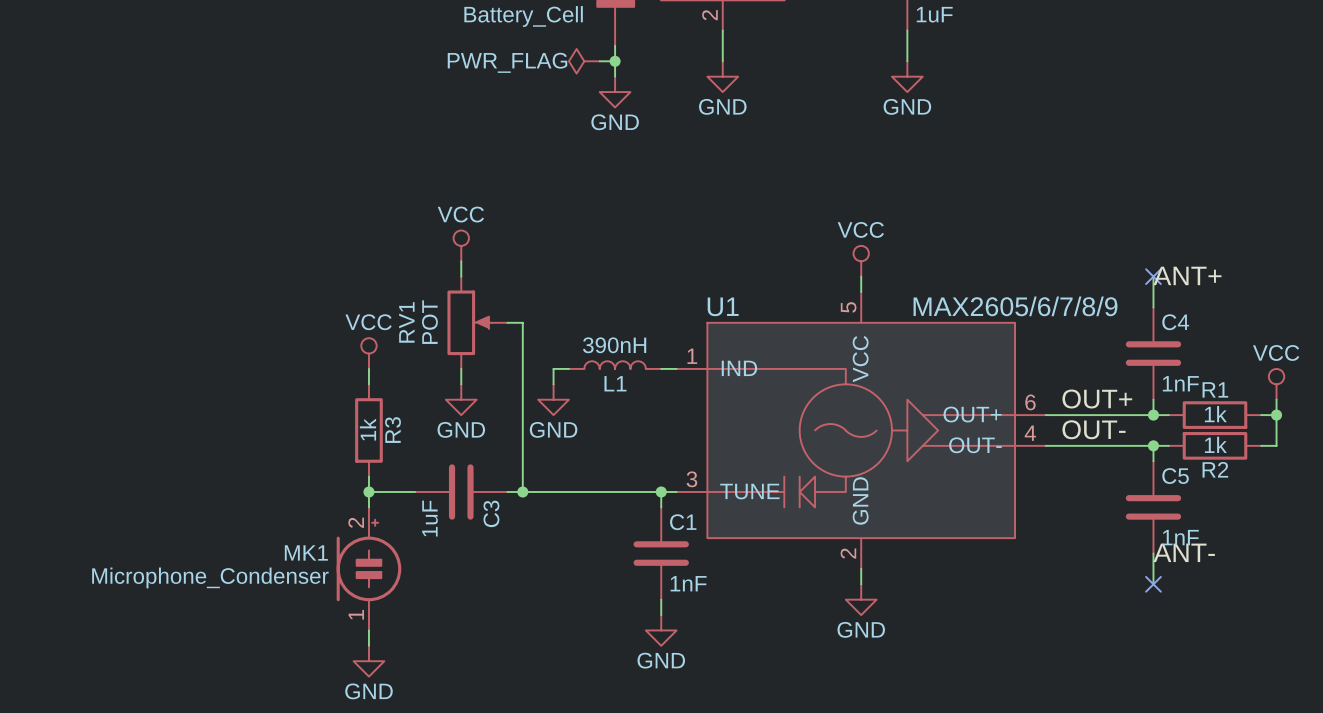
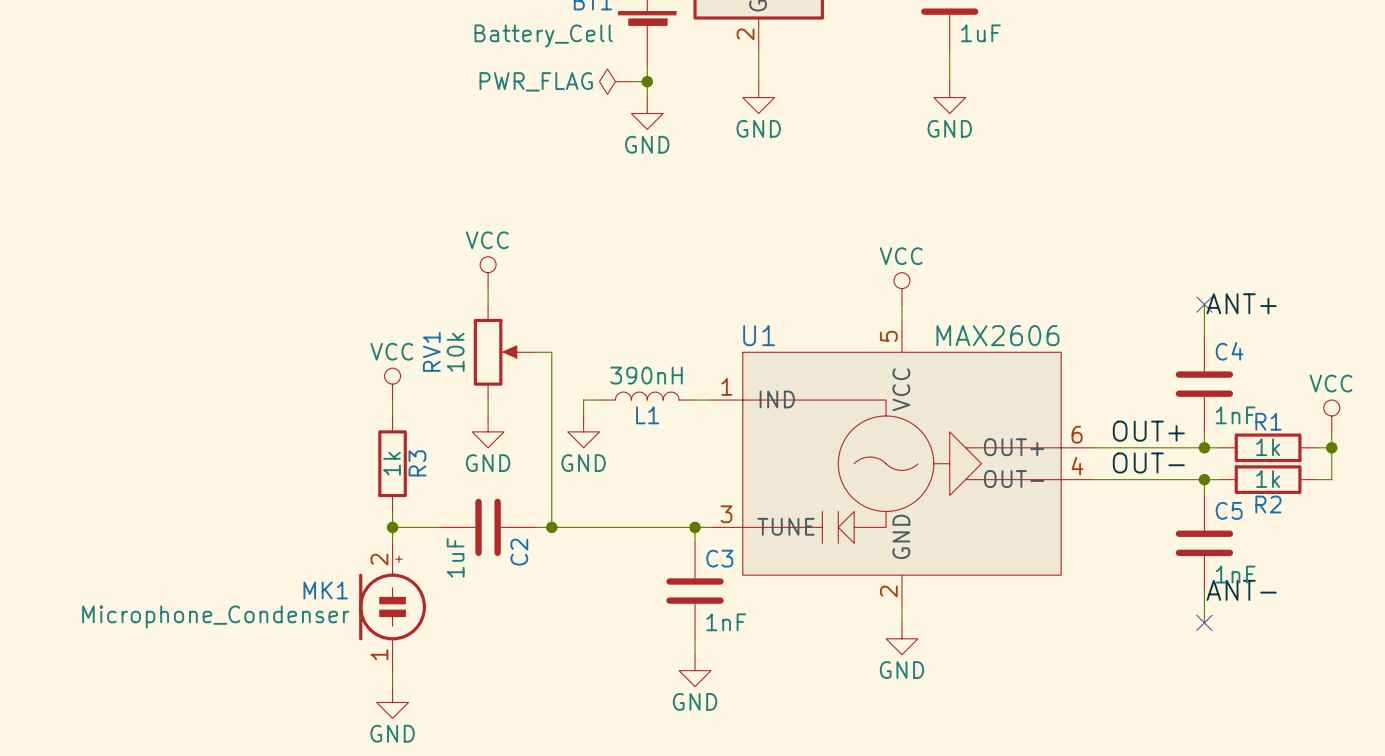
U1 value: MAX2605/6/7/8/9 (1015, 306) -> MAX2606 (997, 335)
RV1 value: POT (429, 322) -> 10k (455, 352)
C3 name: C3 (491, 513) -> C2 (519, 552)
C1 name: C1 (683, 522) -> C3 (719, 558)

